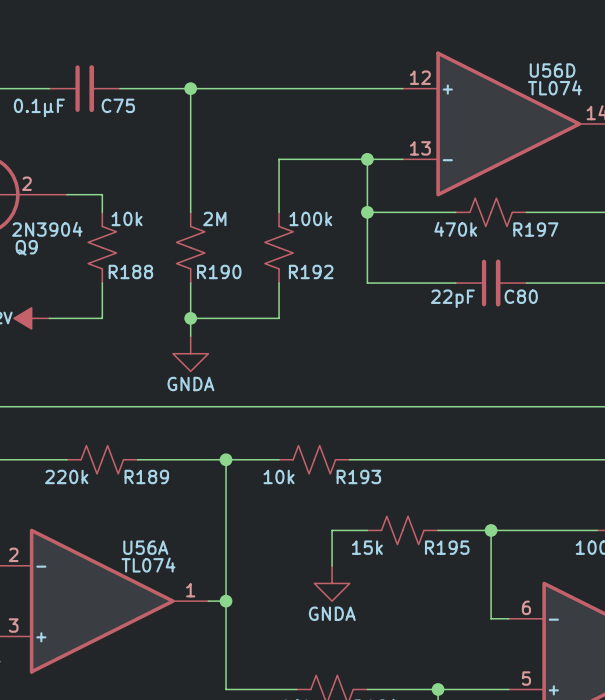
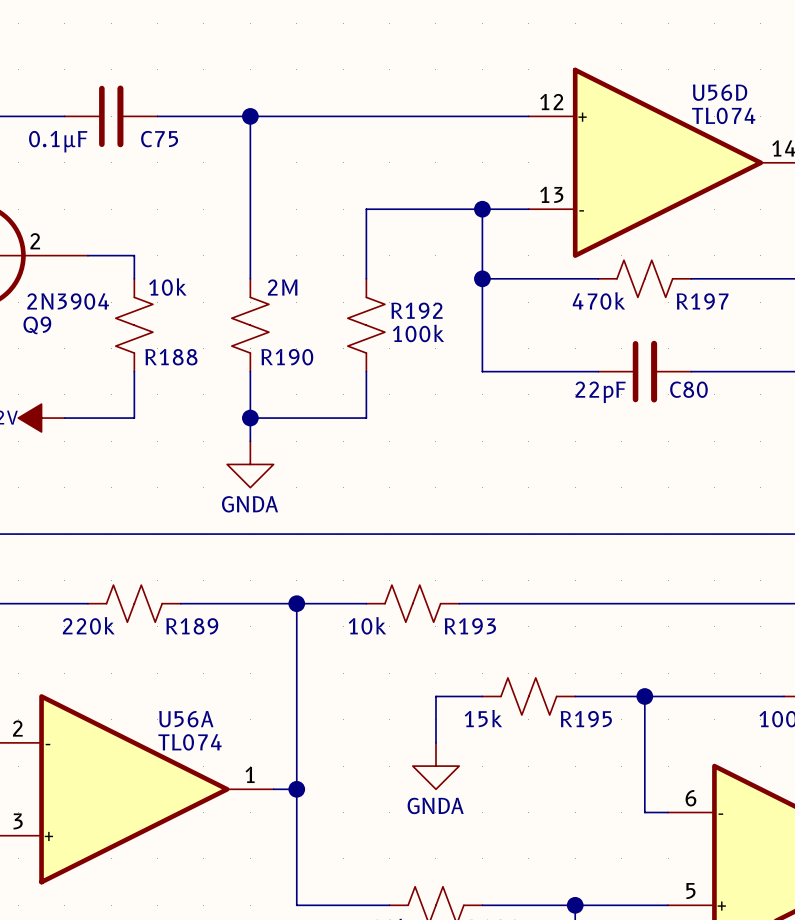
R192 value position: 100k (310, 218) -> 100k (418, 333)
R192 name position: R192 (311, 271) -> R192 (416, 310)

